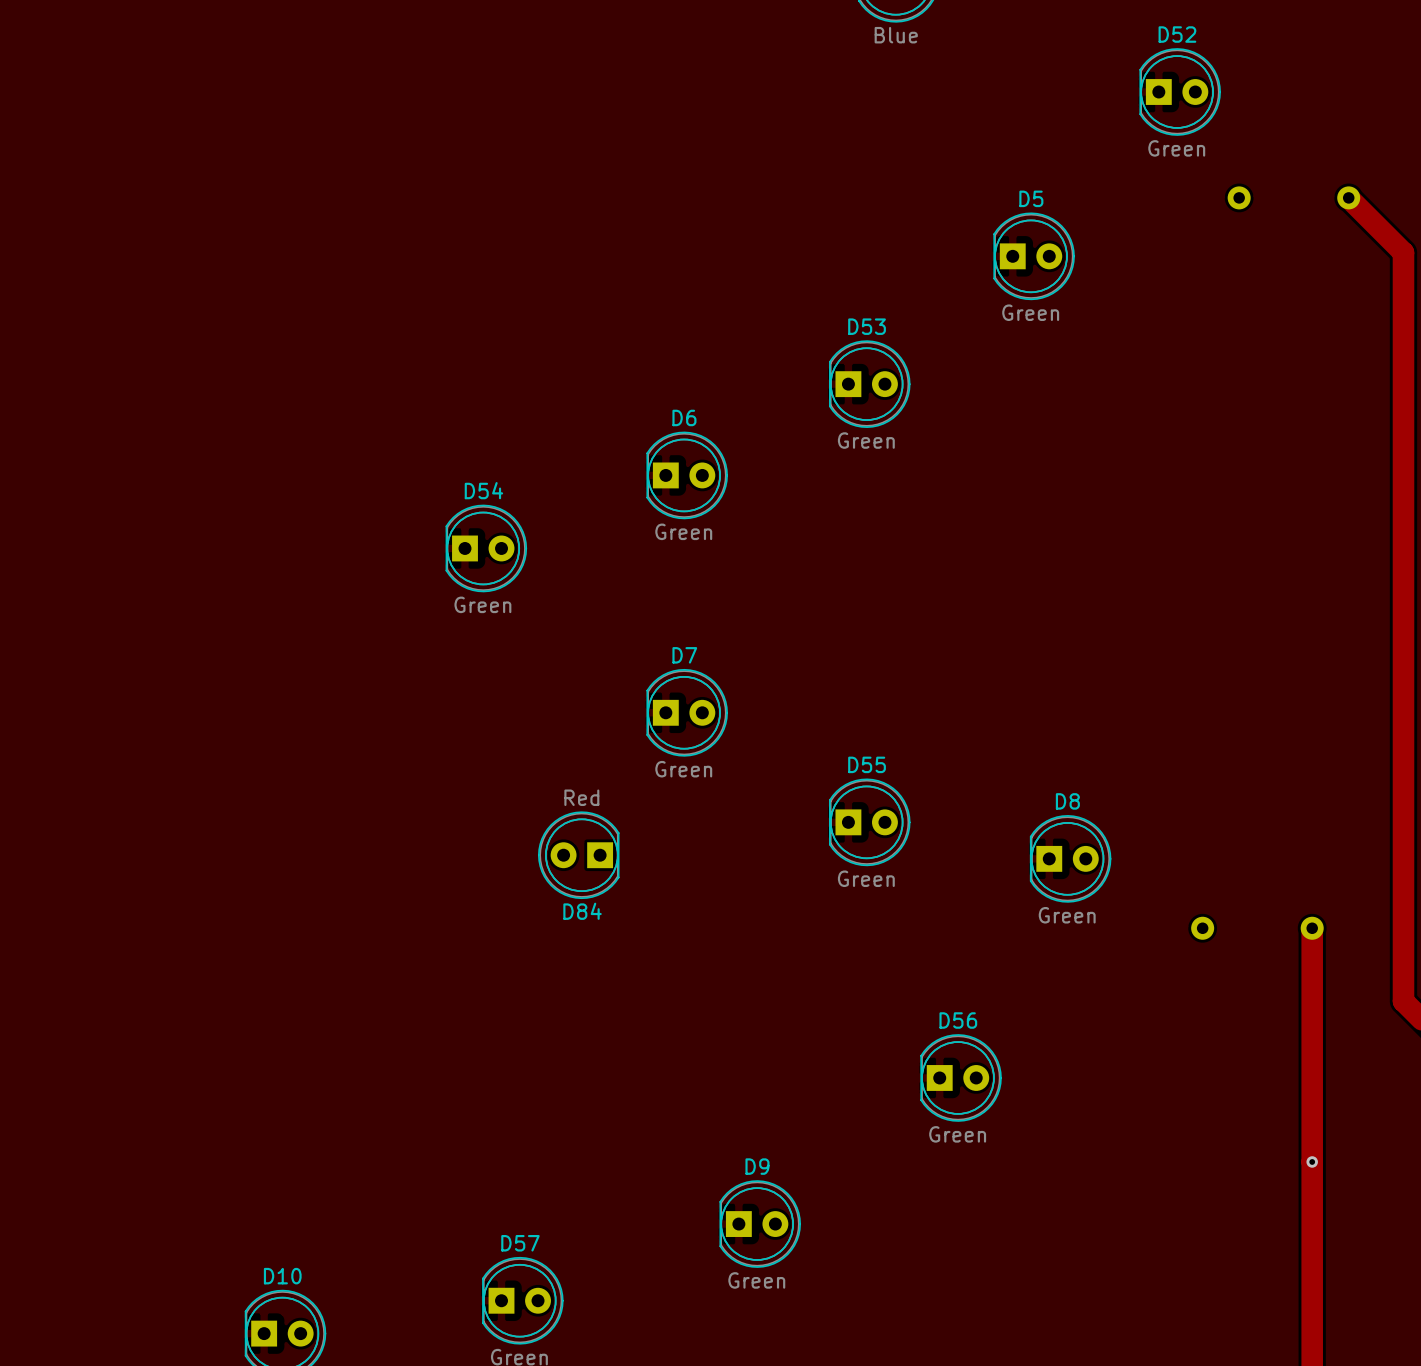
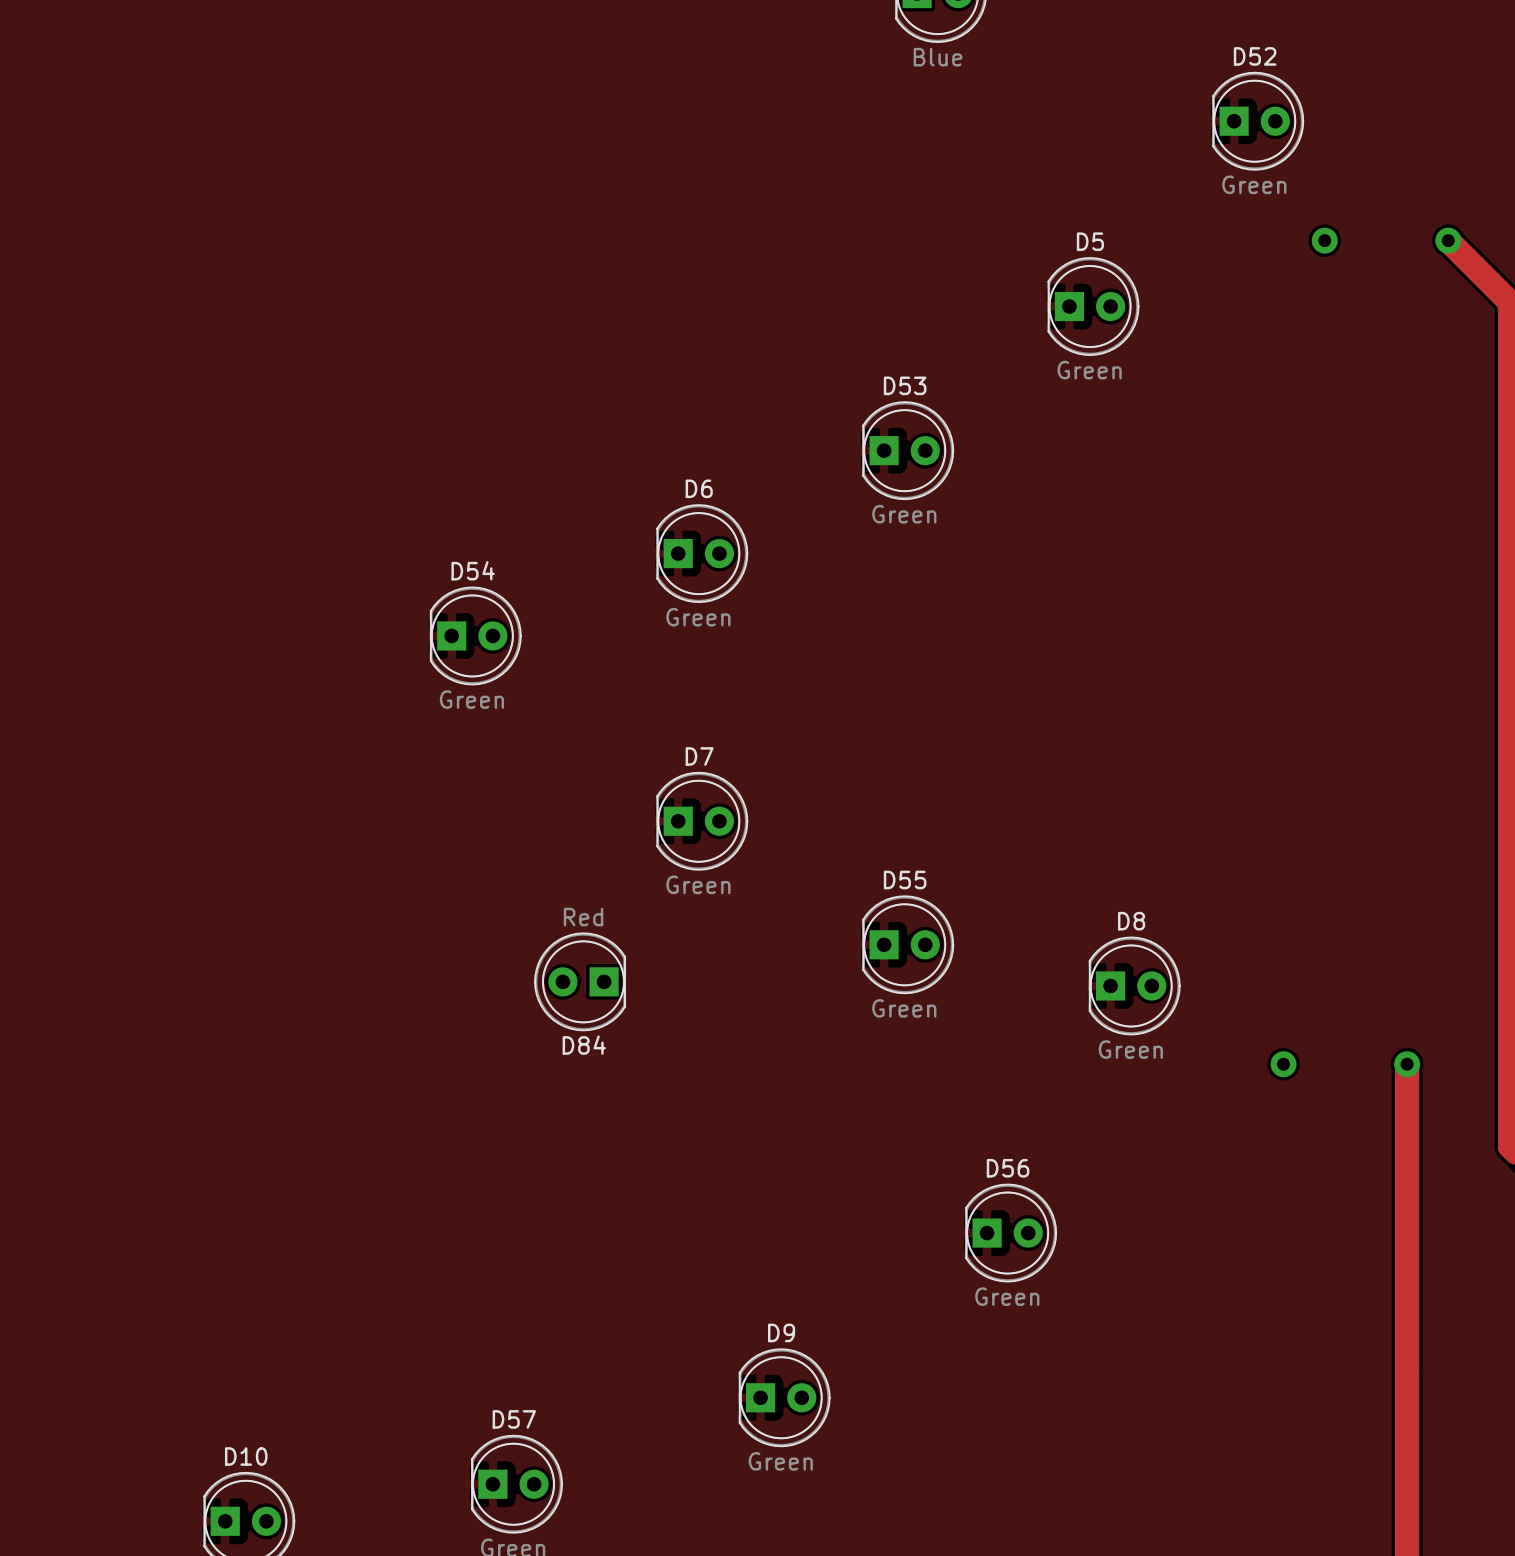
via: (1312, 1161) -> none

